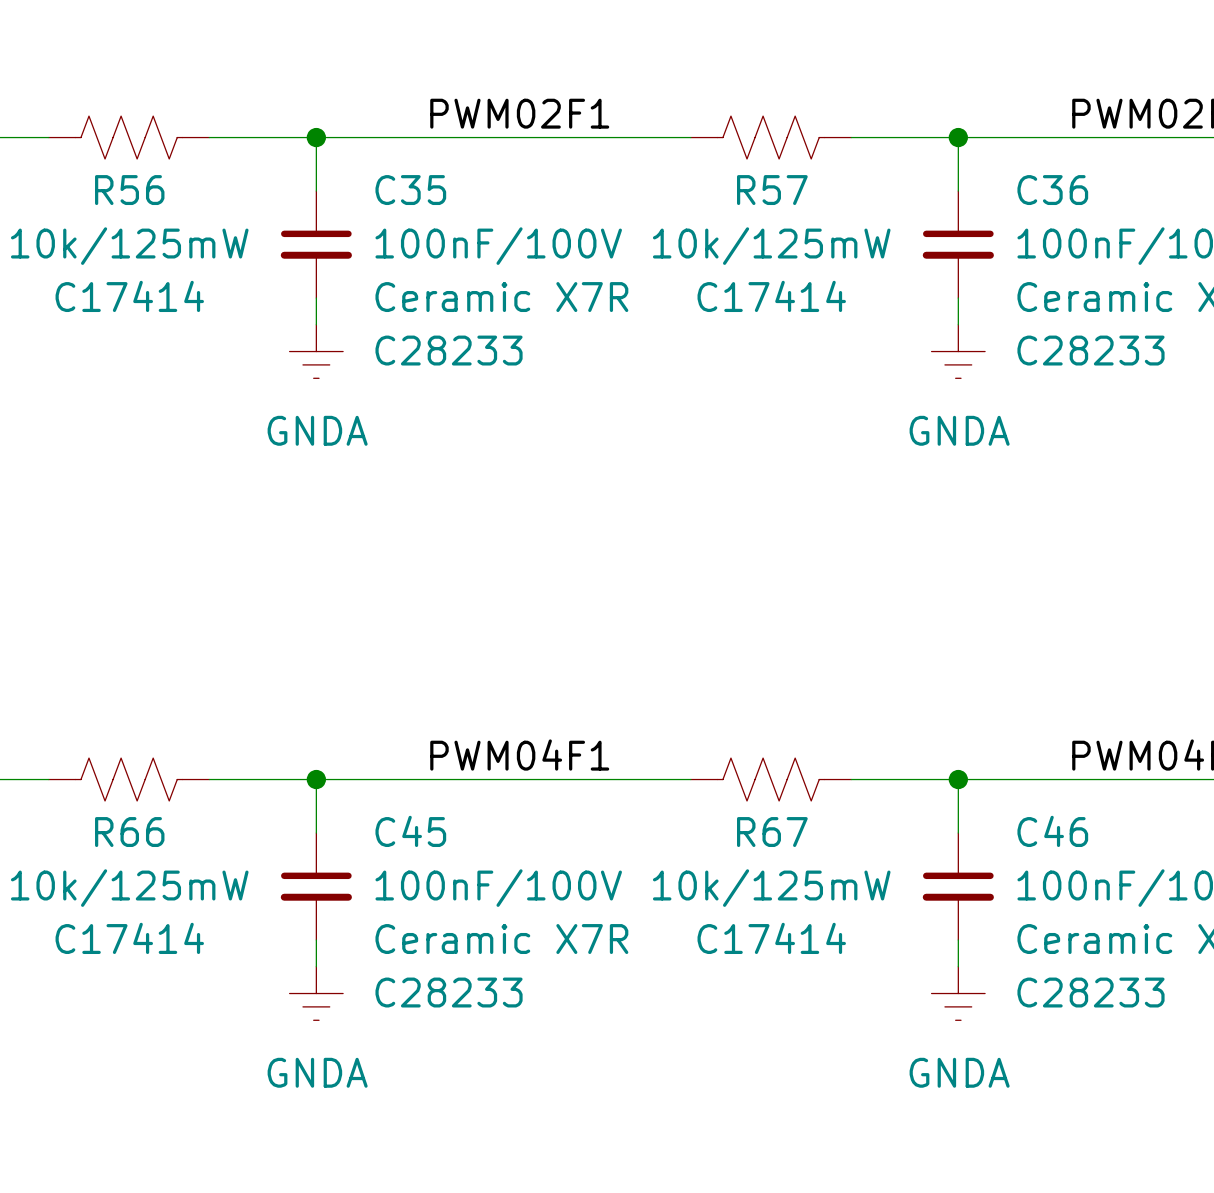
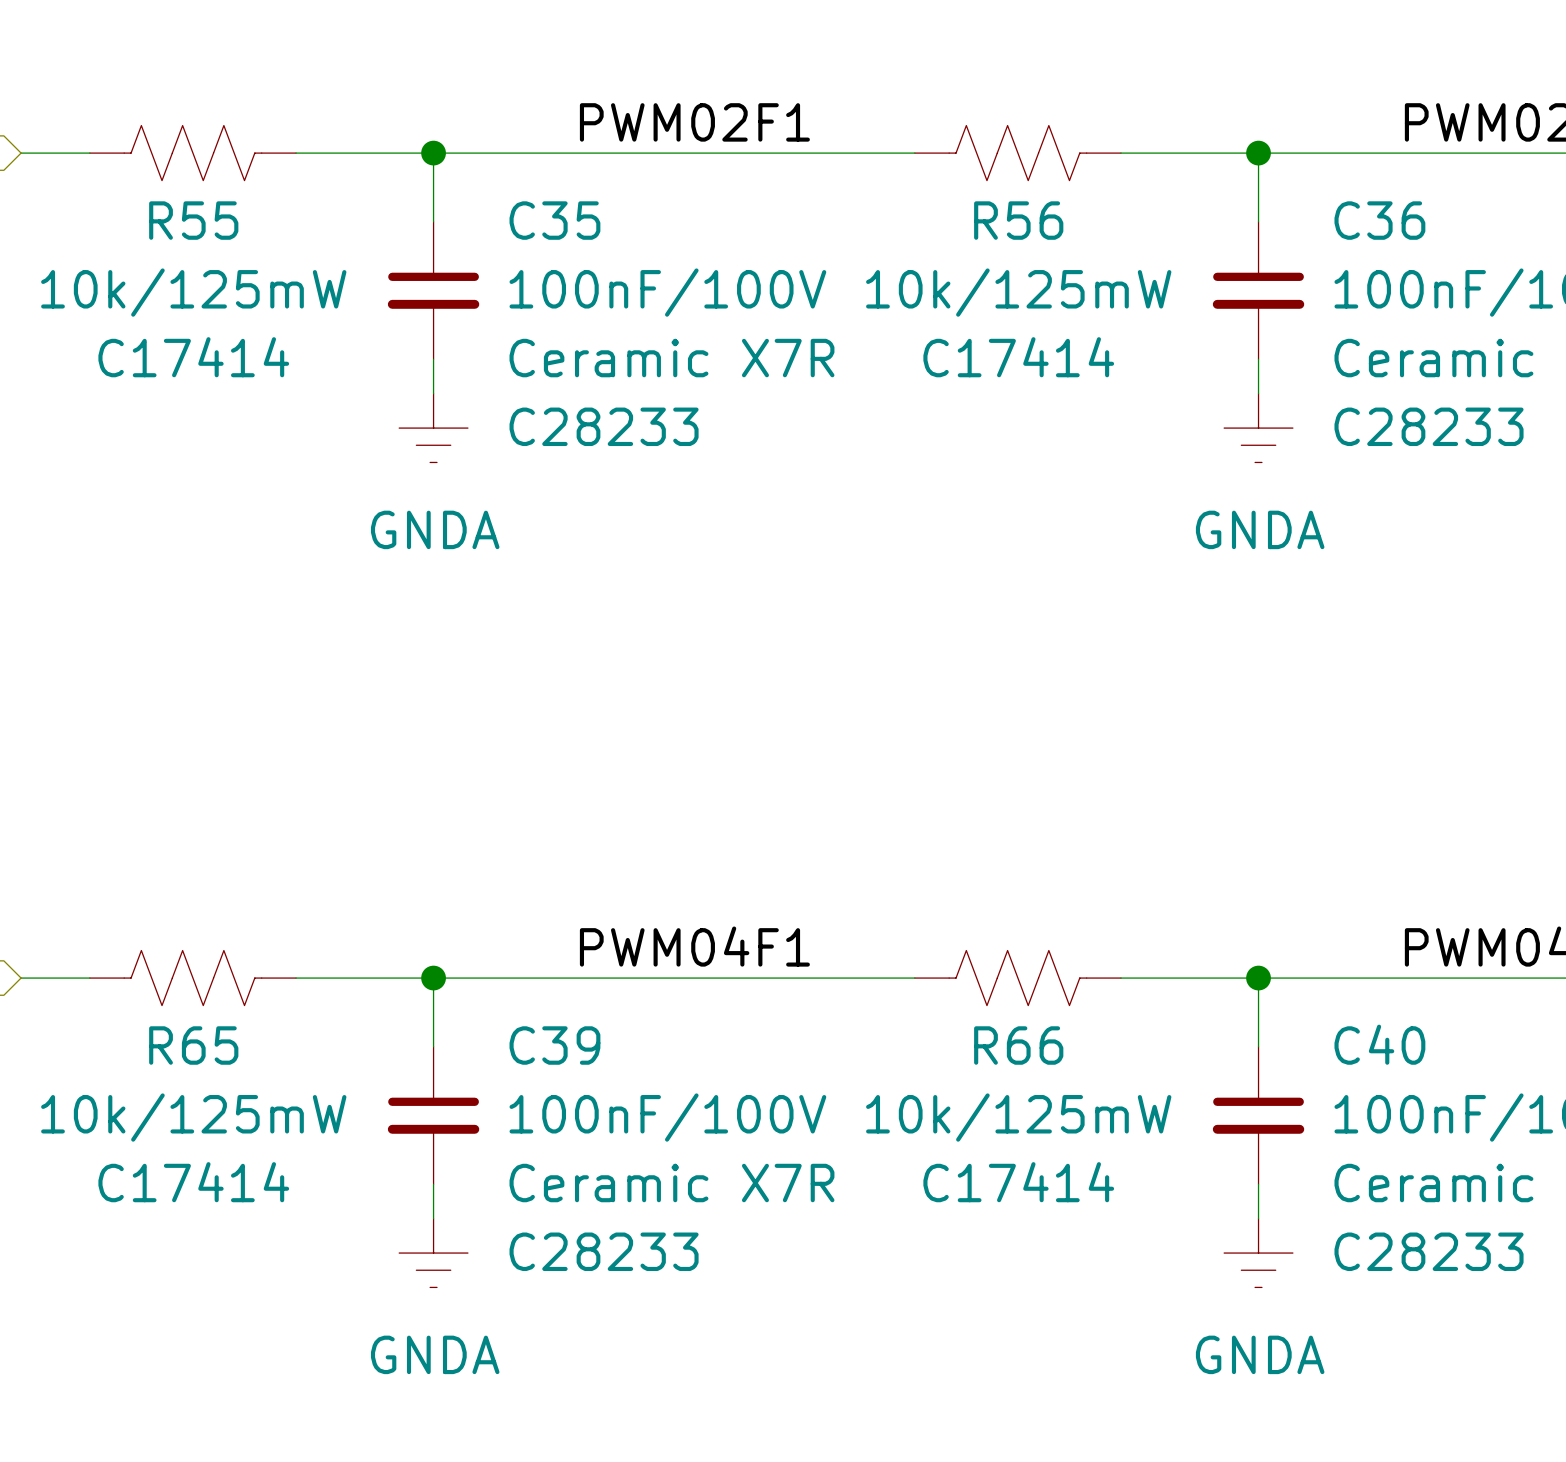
R56 name: R56 (129, 190) -> R55 (193, 220)
R57 name: R57 (772, 190) -> R56 (1018, 220)
C45 name: C45 (410, 831) -> C39 (554, 1045)
C46 name: C46 (1052, 831) -> C40 (1379, 1044)
R66 name: R66 (129, 832) -> R65 (193, 1045)
R67 name: R67 (772, 832) -> R66 (1018, 1045)

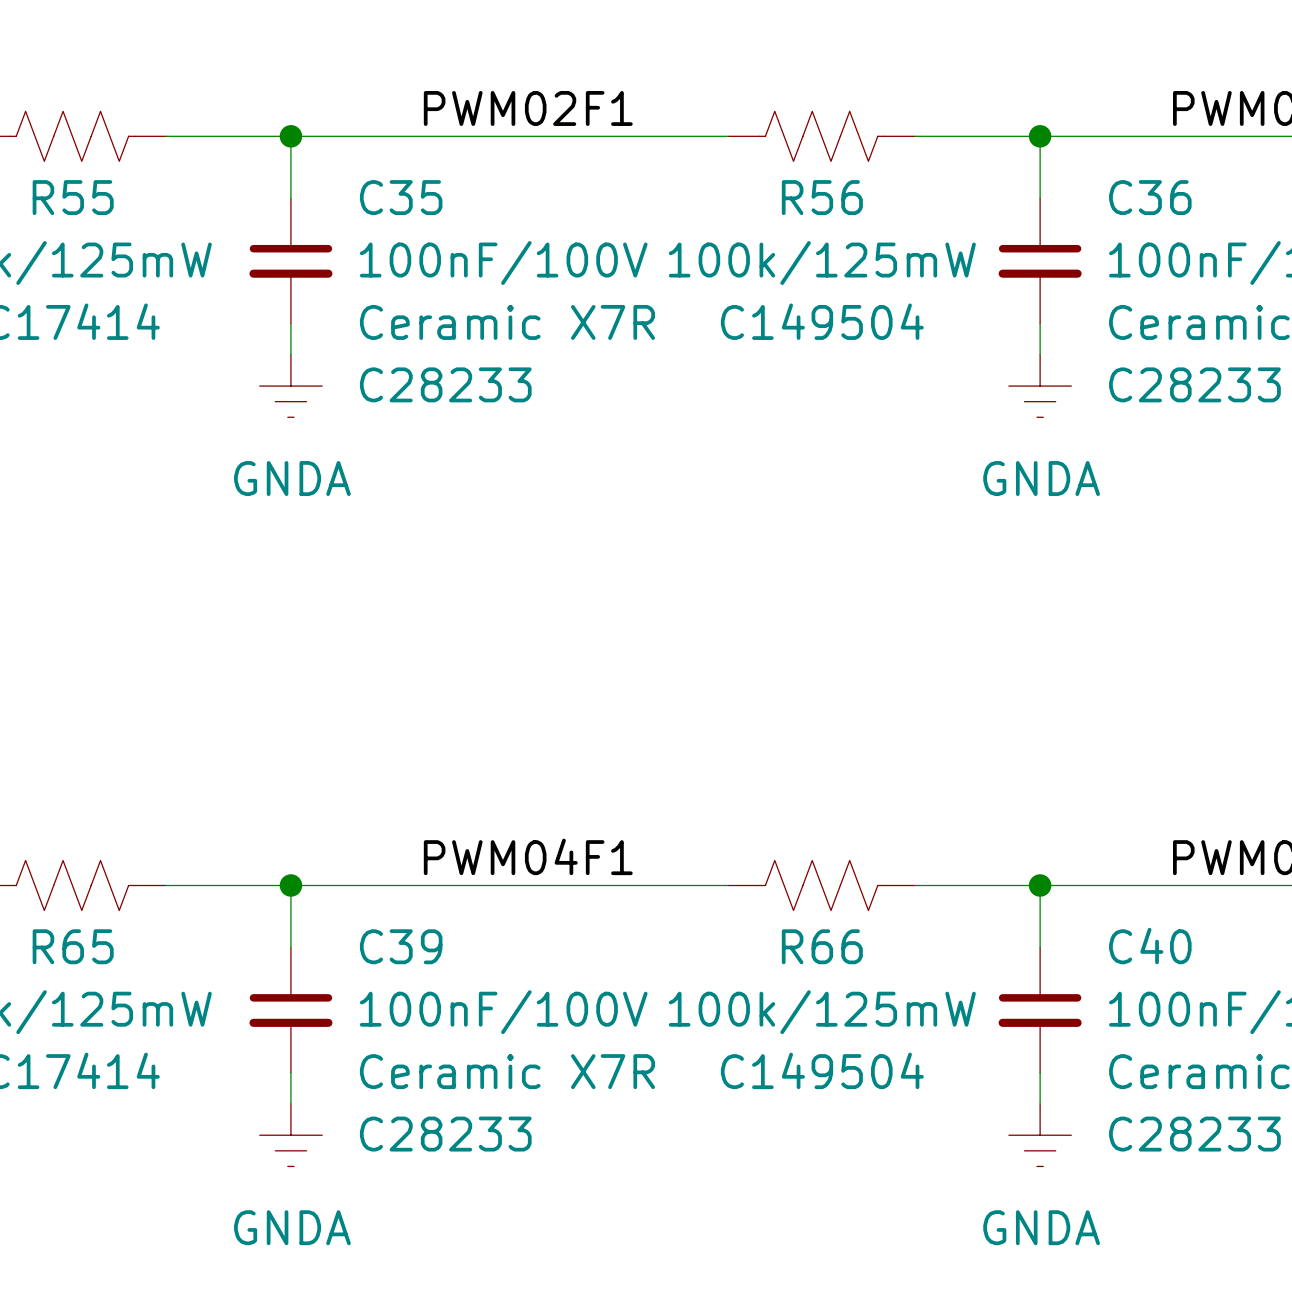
R56 value: 10k/125mW (1018, 292) -> 100k/125mW (822, 262)
R56 text: C17414 (1018, 357) -> C149504 (822, 321)
R66 value: 10k/125mW (1018, 1117) -> 100k/125mW (822, 1012)
R66 text: C17414 (1018, 1182) -> C149504 (822, 1070)

